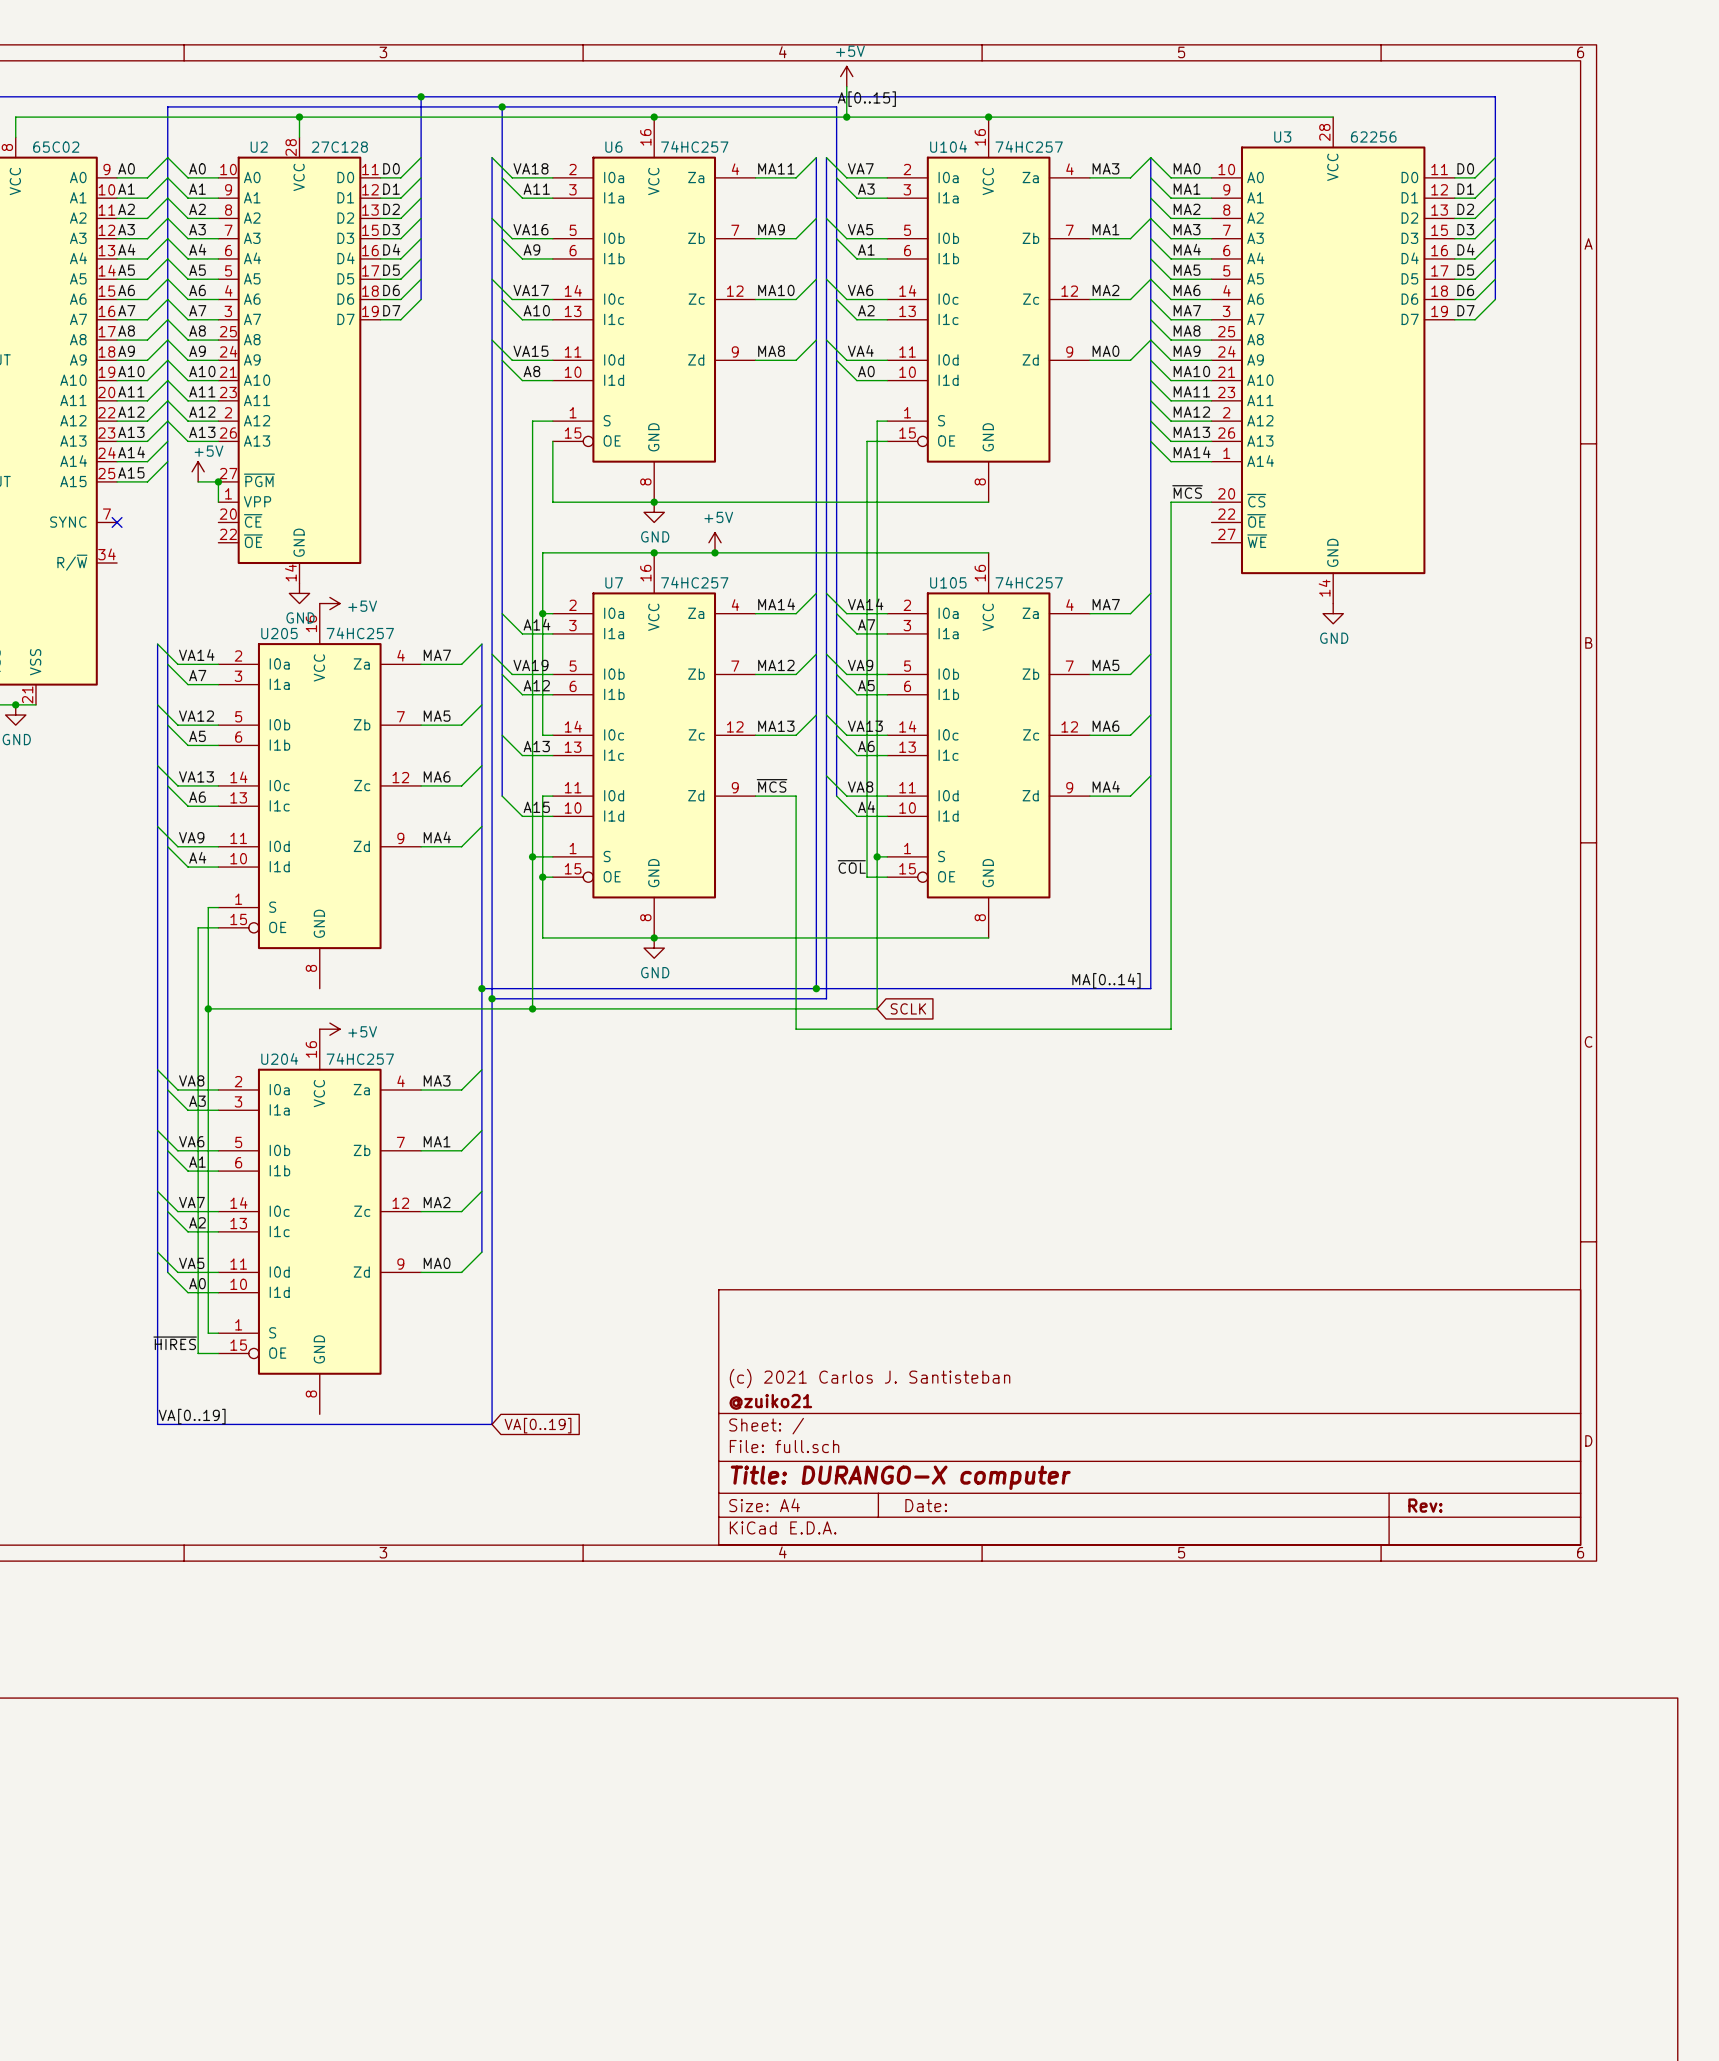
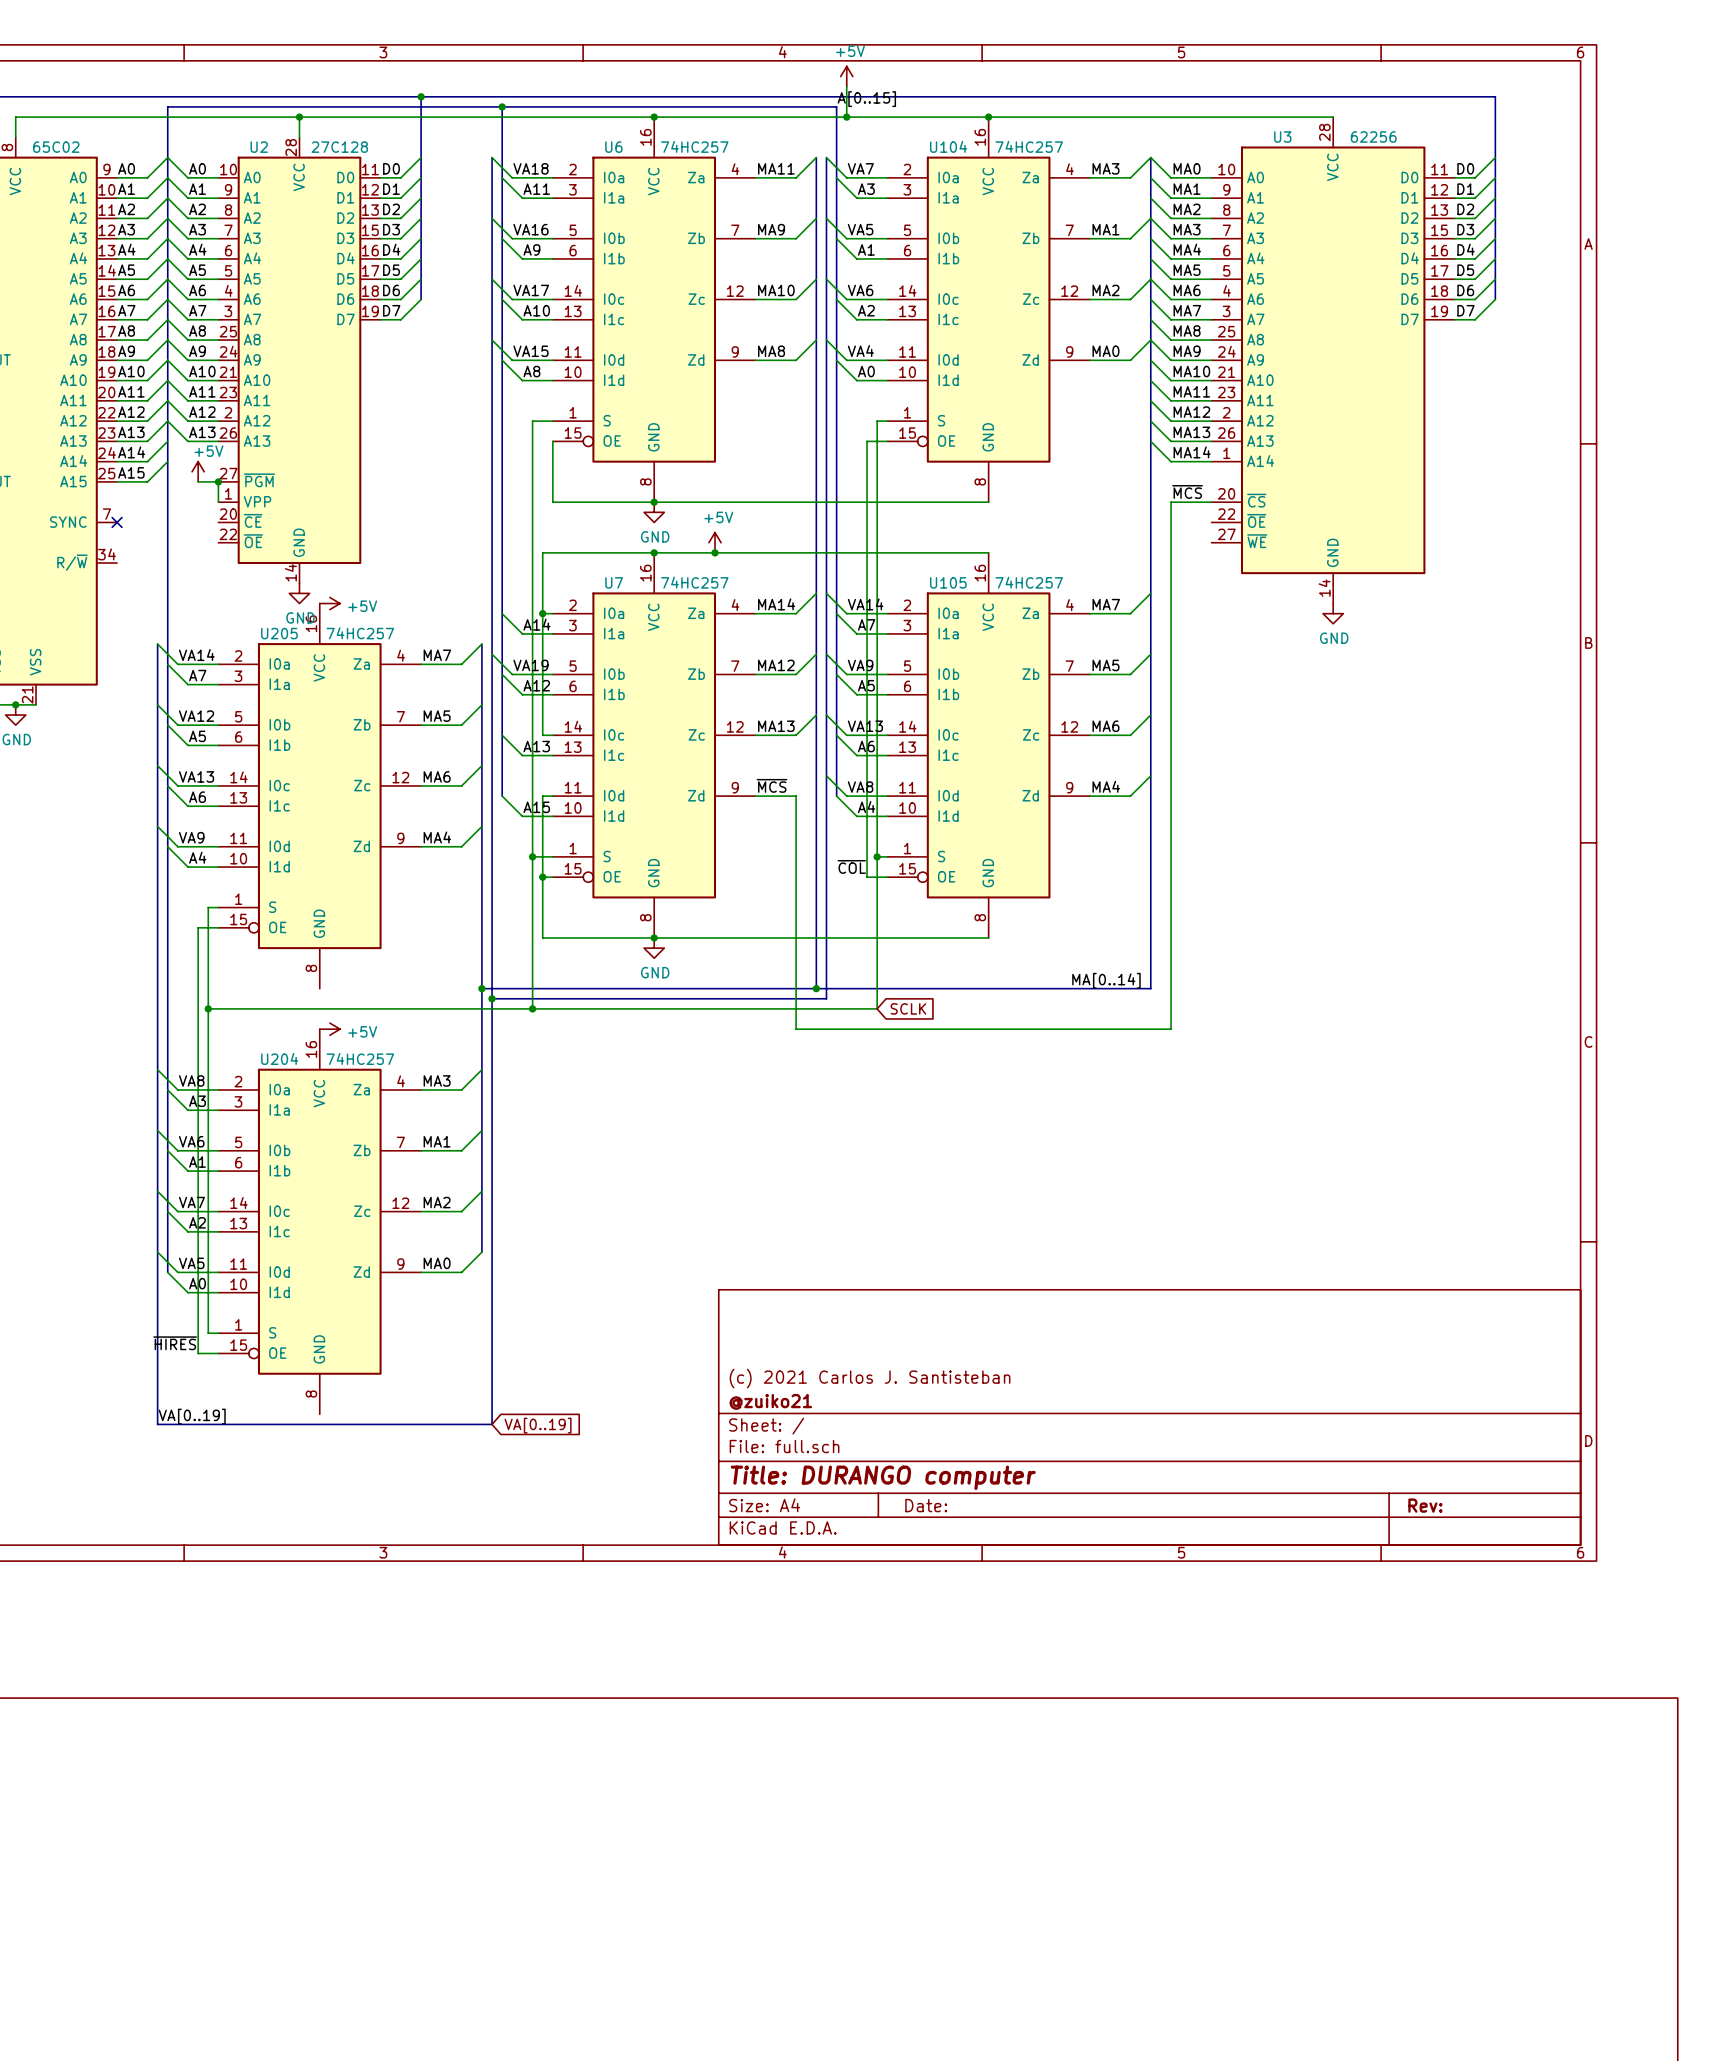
title block: Title: DURANGO-X computer (900, 1477) -> Title: DURANGO computer (883, 1477)

